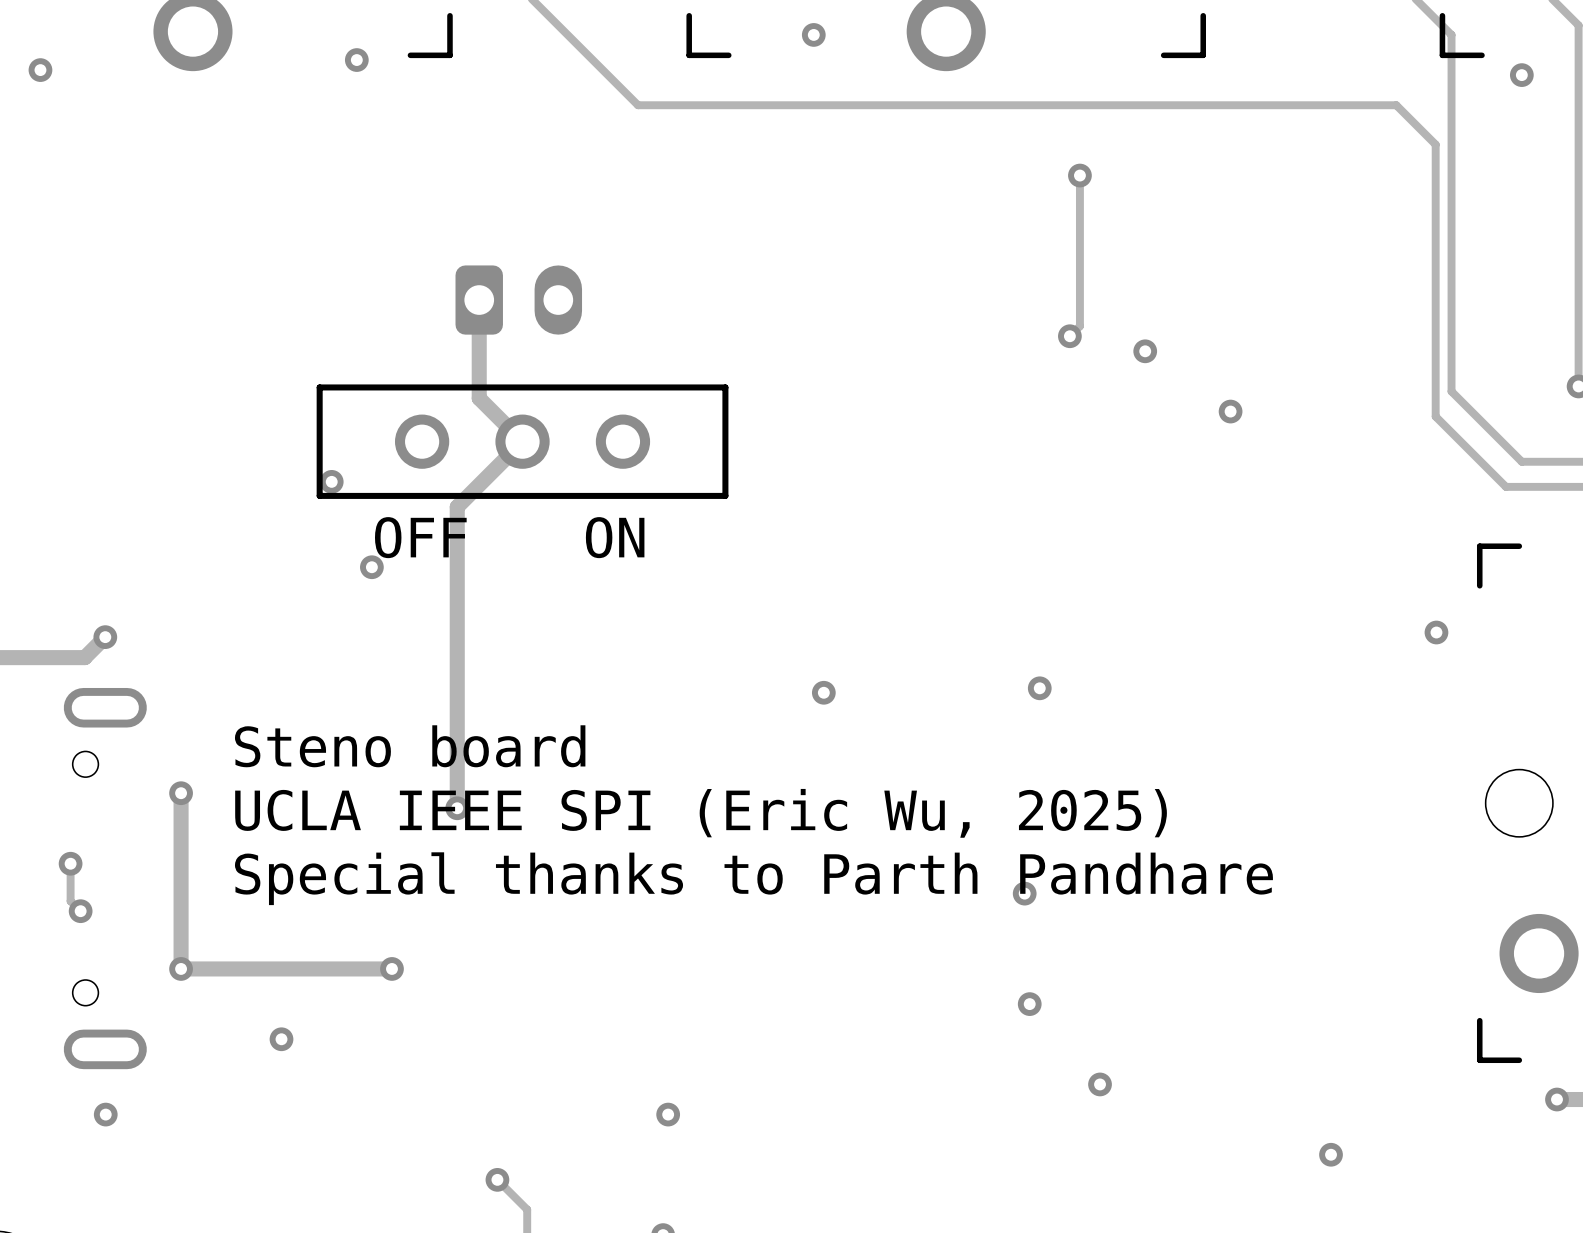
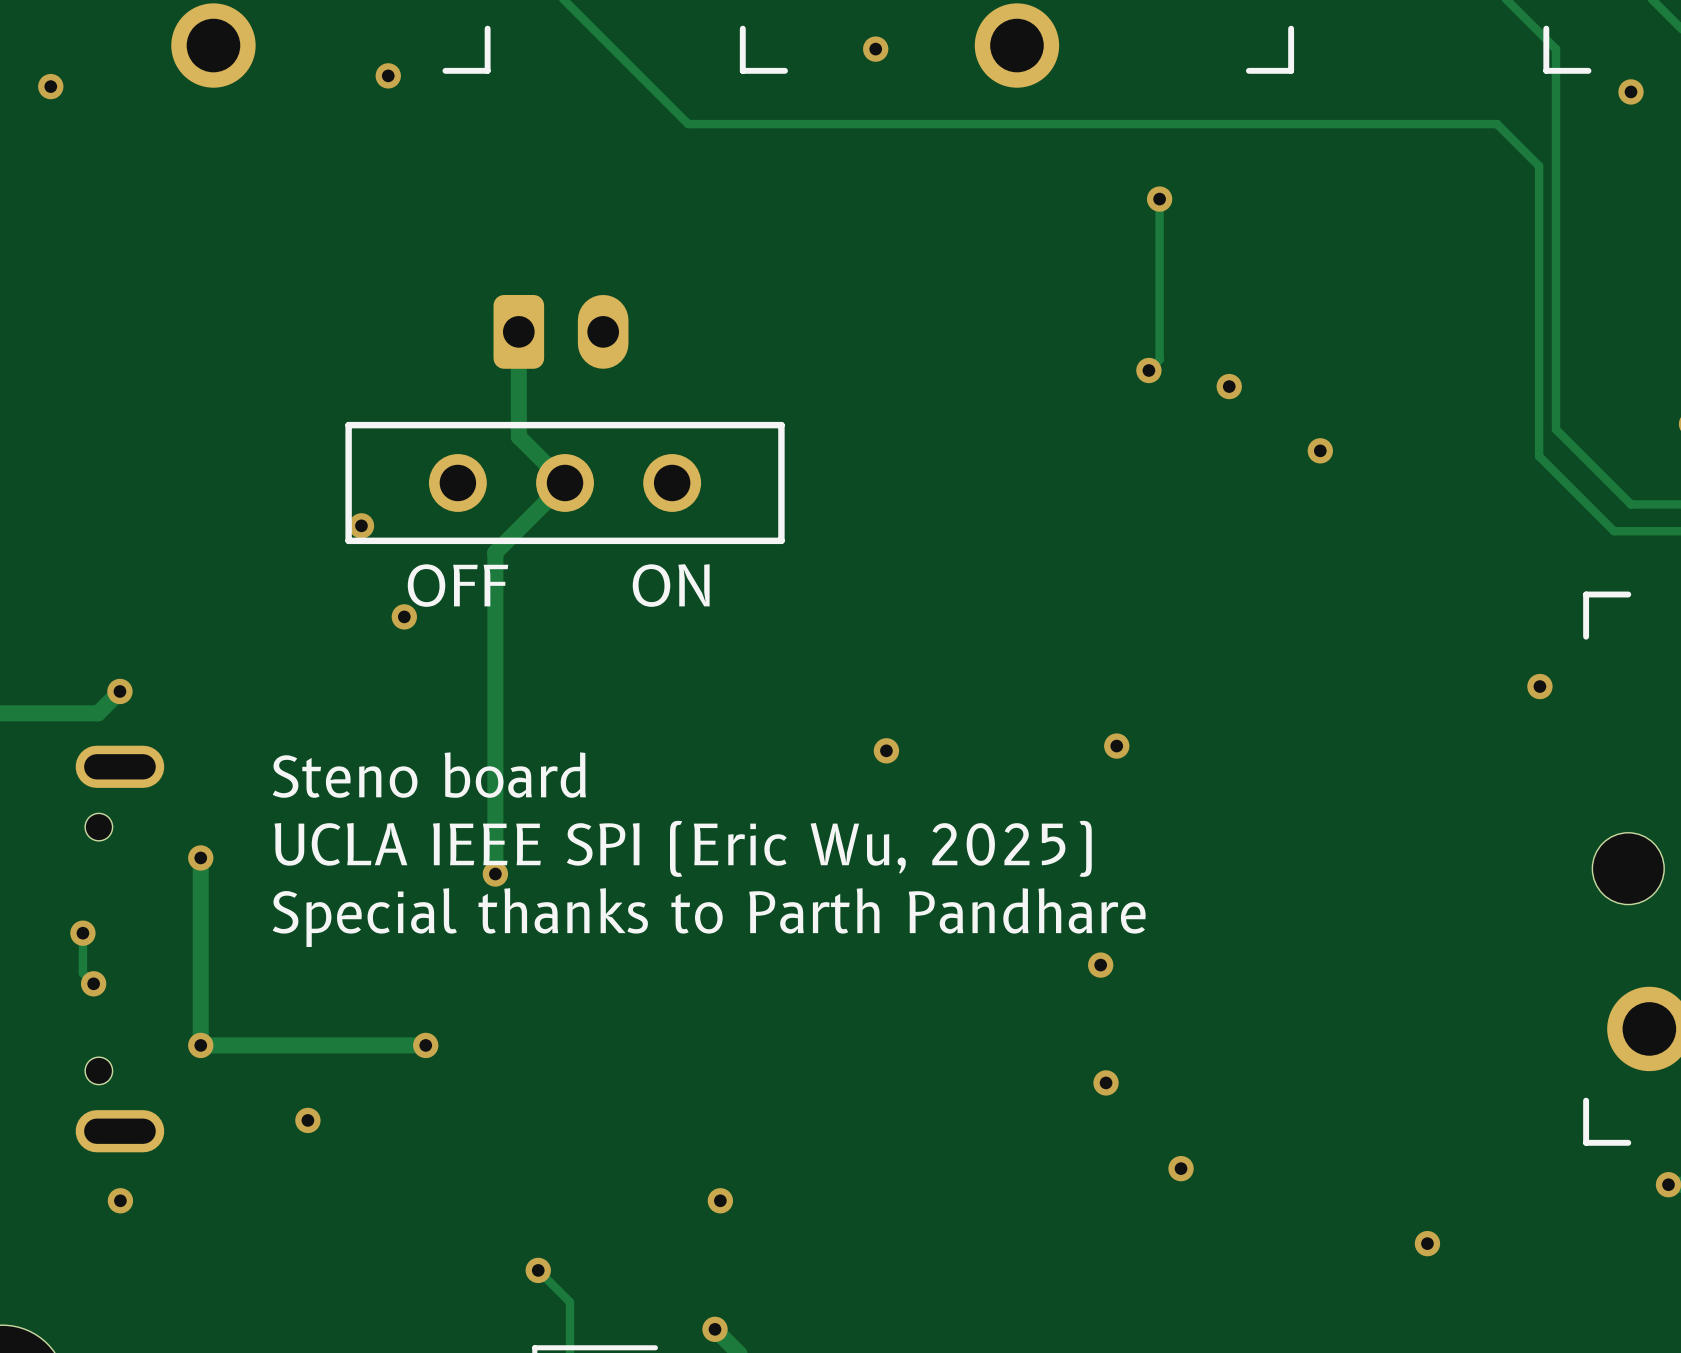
text position: Steno board (410, 746) -> Steno board (429, 775)
text position: UCLA IEEE SPI (Eric Wu, 2025) (701, 813) -> UCLA IEEE SPI (Eric Wu, 2025) (683, 848)
text position: Special thanks to Parth Pandhare (753, 878) -> Special thanks to Parth Pandhare (709, 917)

